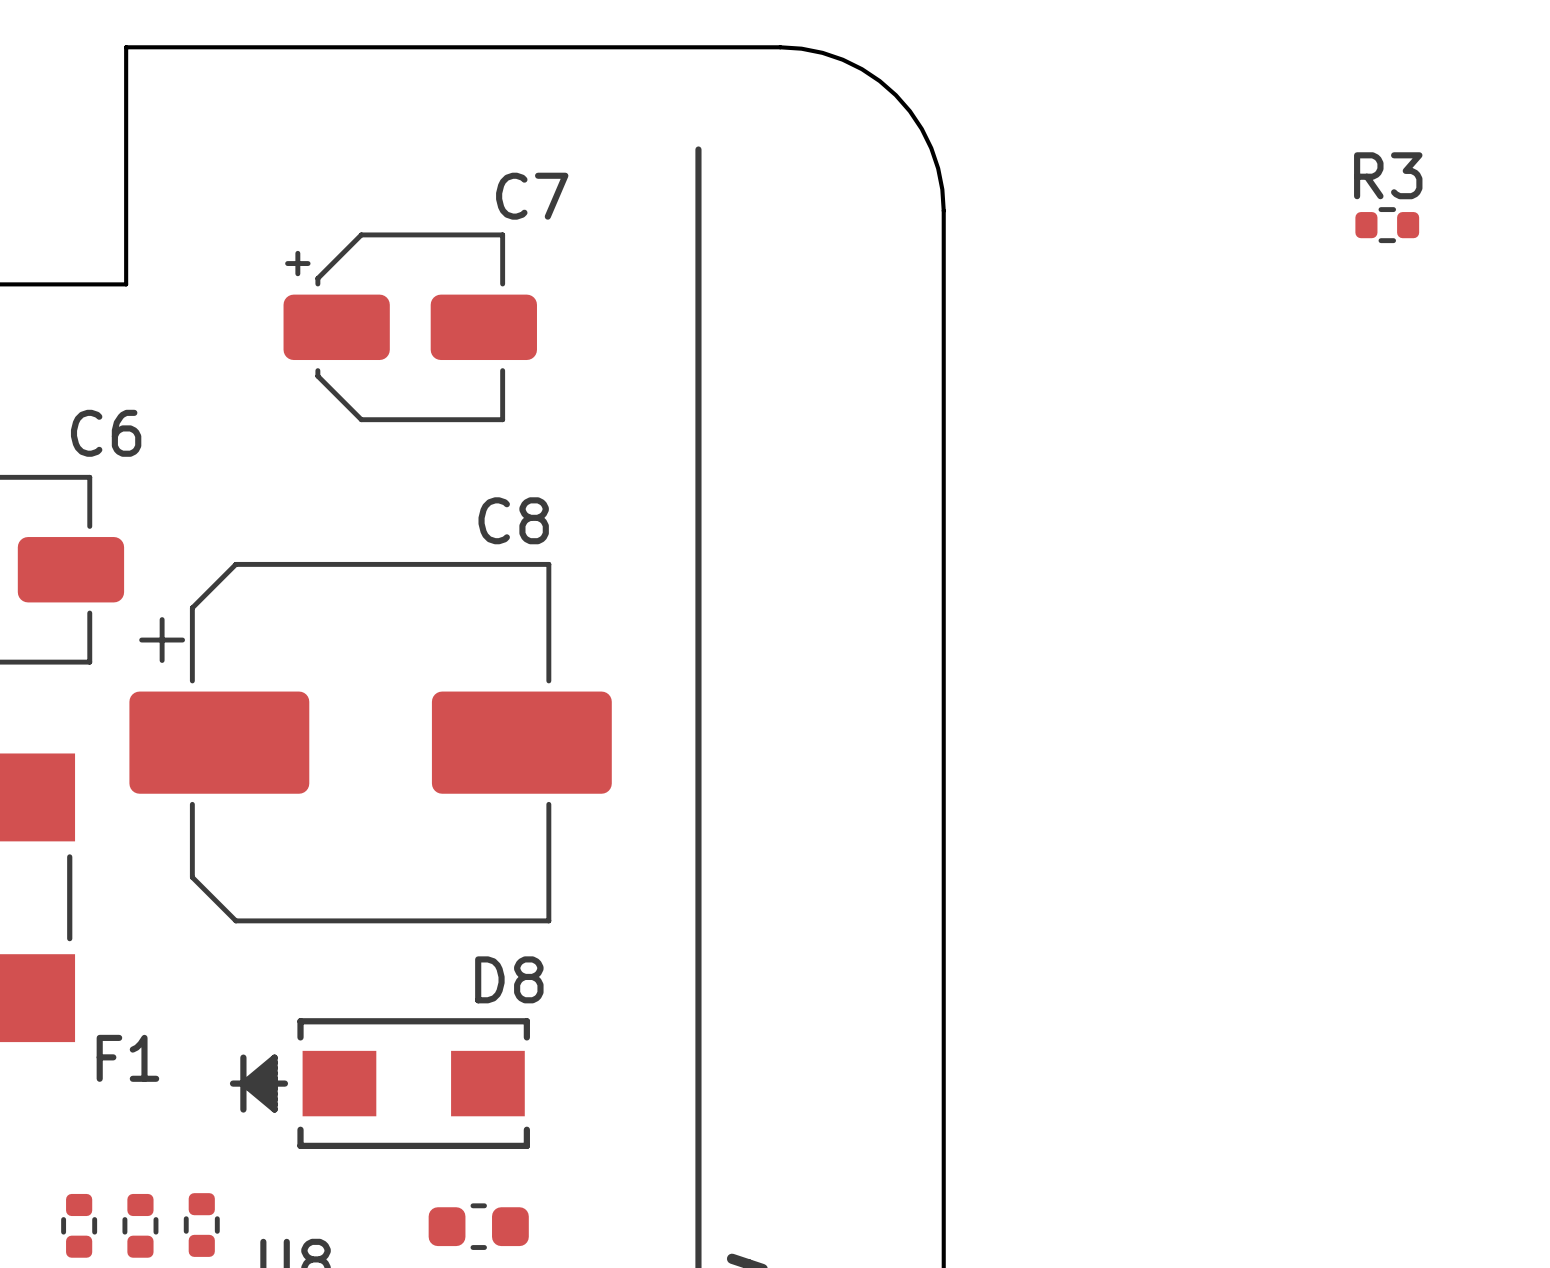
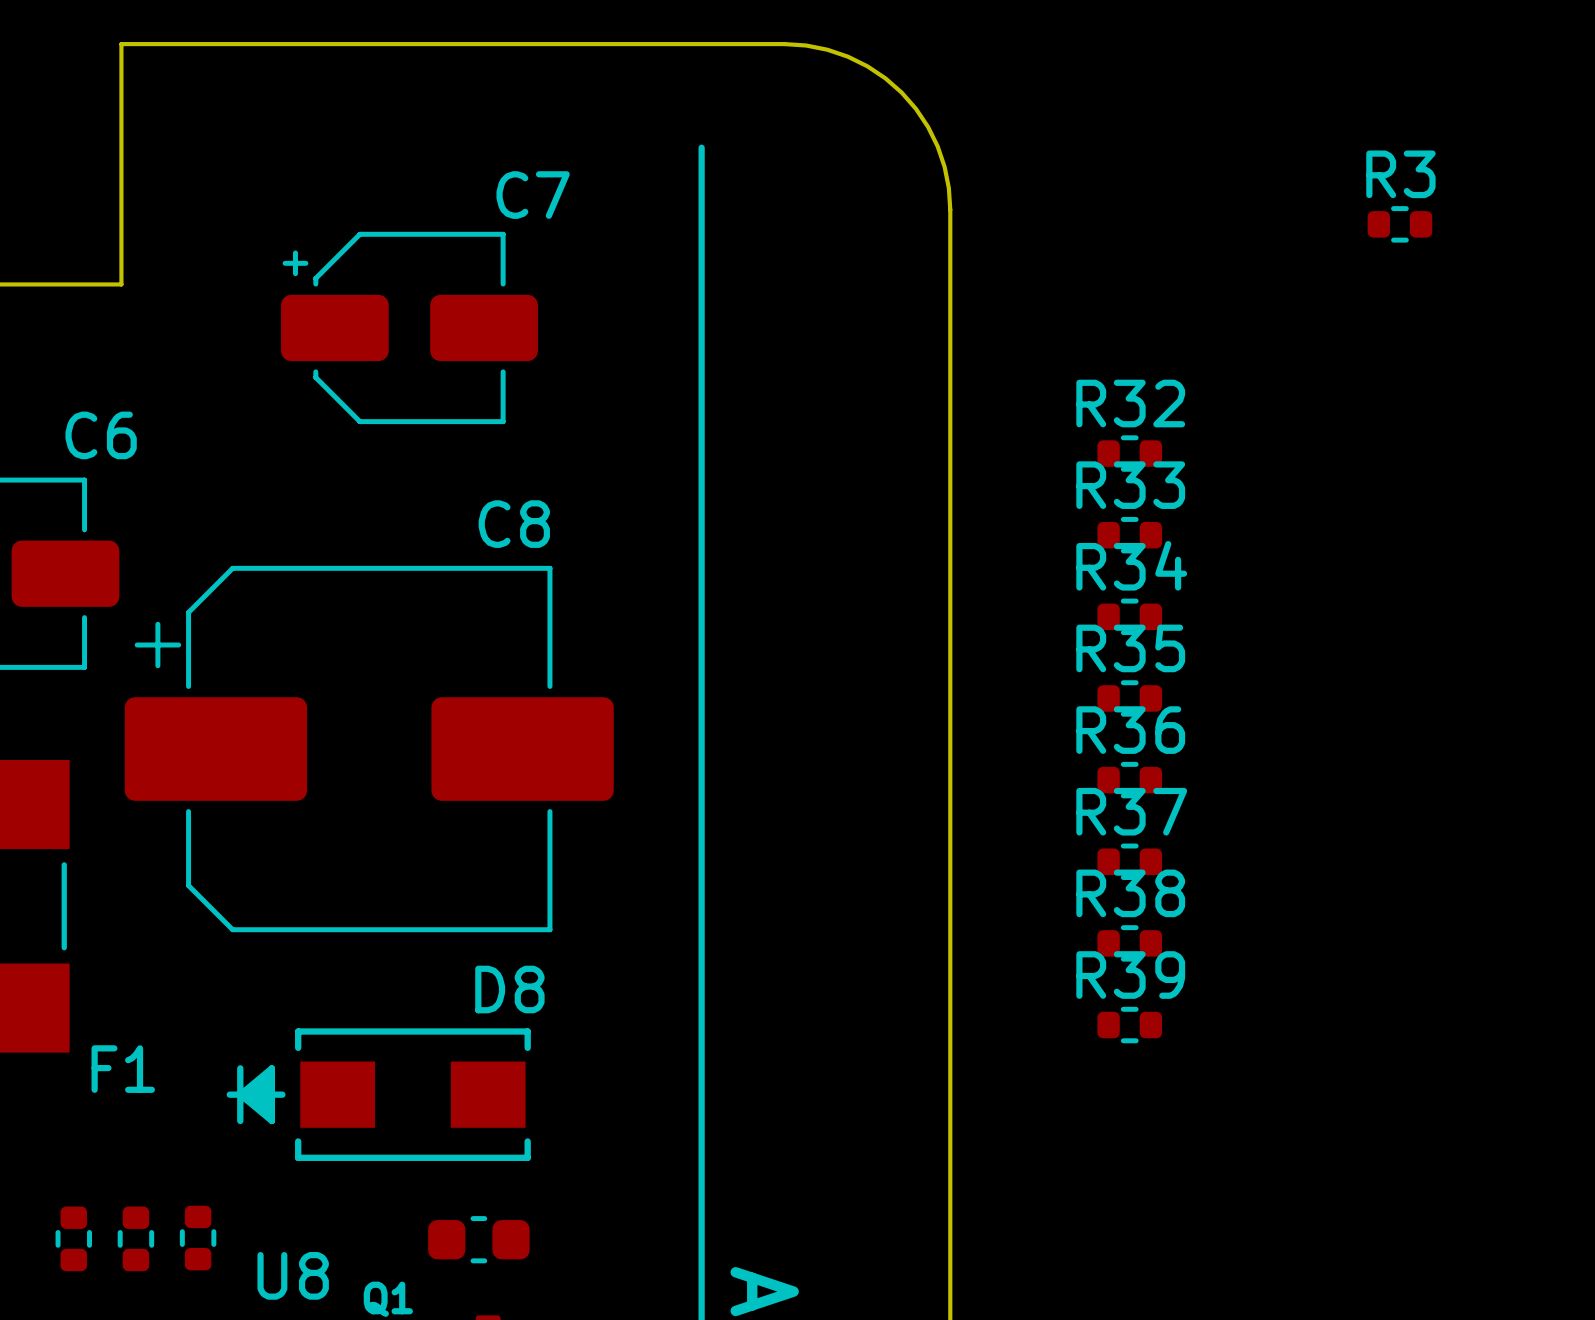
R32: none -> (1129, 453)
R33: none -> (1129, 535)
R34: none -> (1129, 616)
R35: none -> (1129, 698)
R36: none -> (1129, 780)
R37: none -> (1129, 861)
R38: none -> (1129, 943)
R39: none -> (1129, 1025)

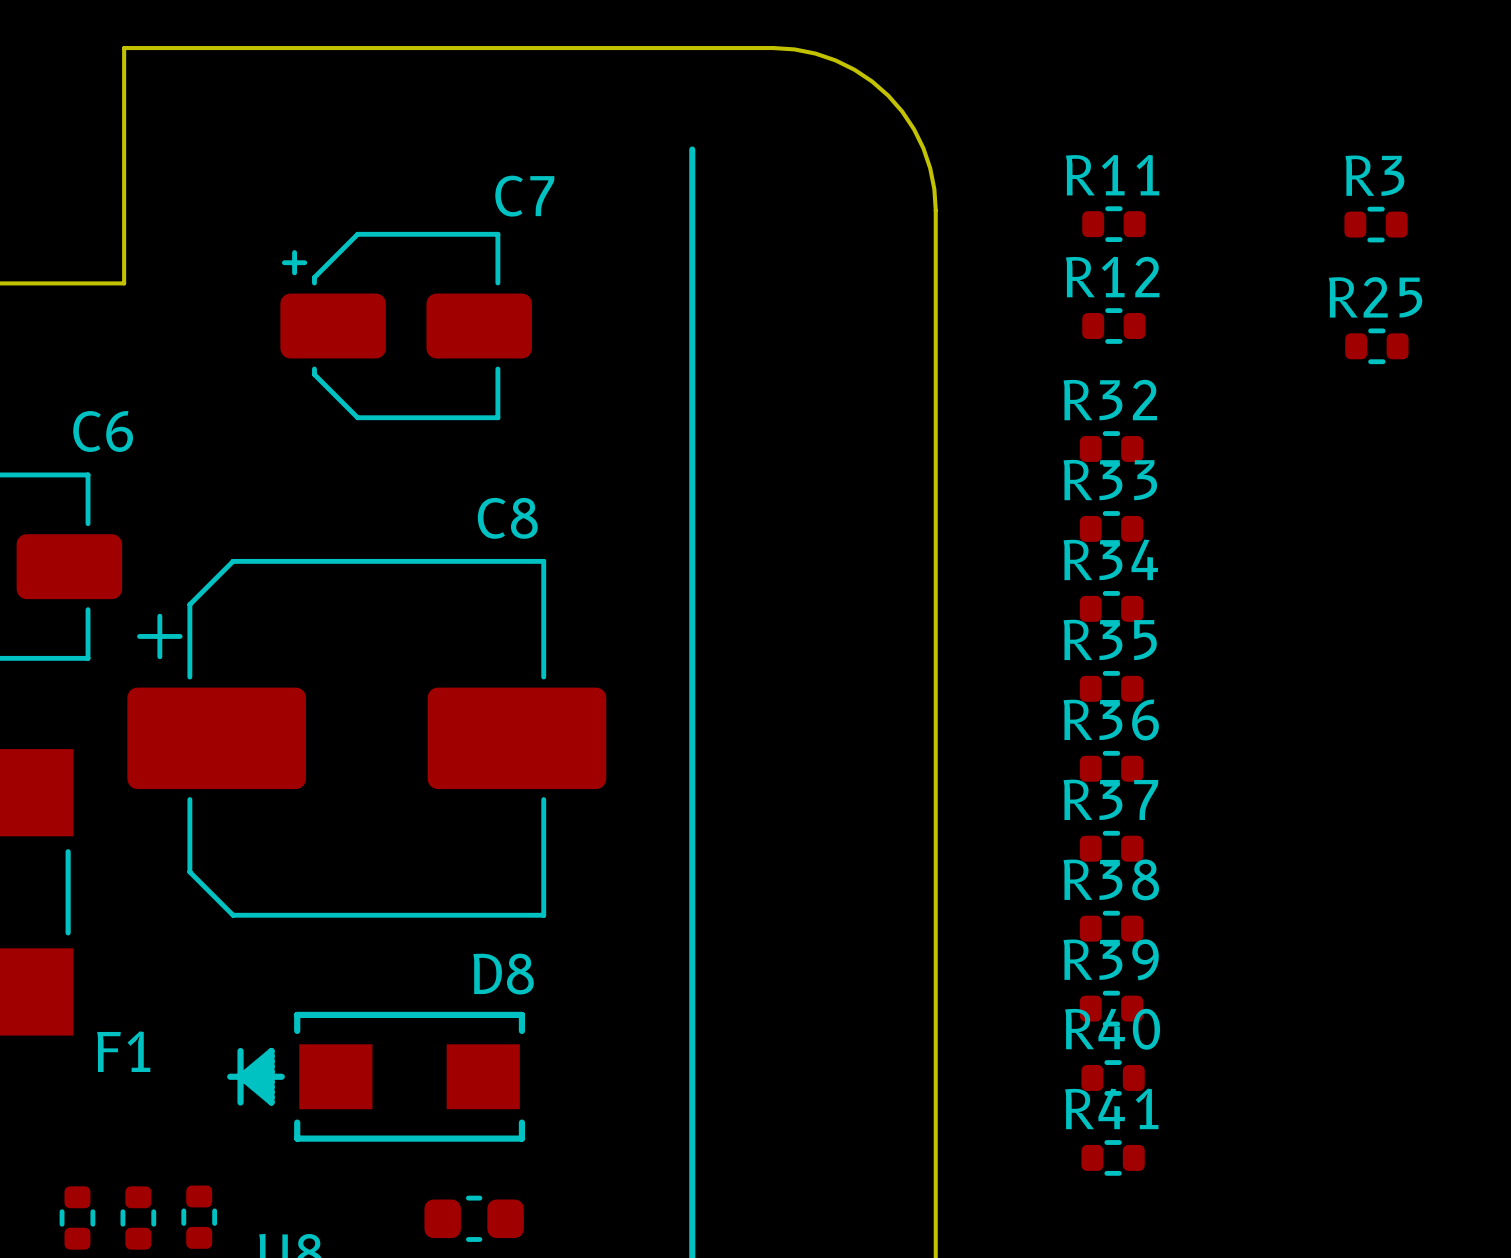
R11: none -> (1113, 224)
R12: none -> (1113, 326)
R25: none -> (1376, 346)
R40: none -> (1113, 1077)
R41: none -> (1113, 1157)

